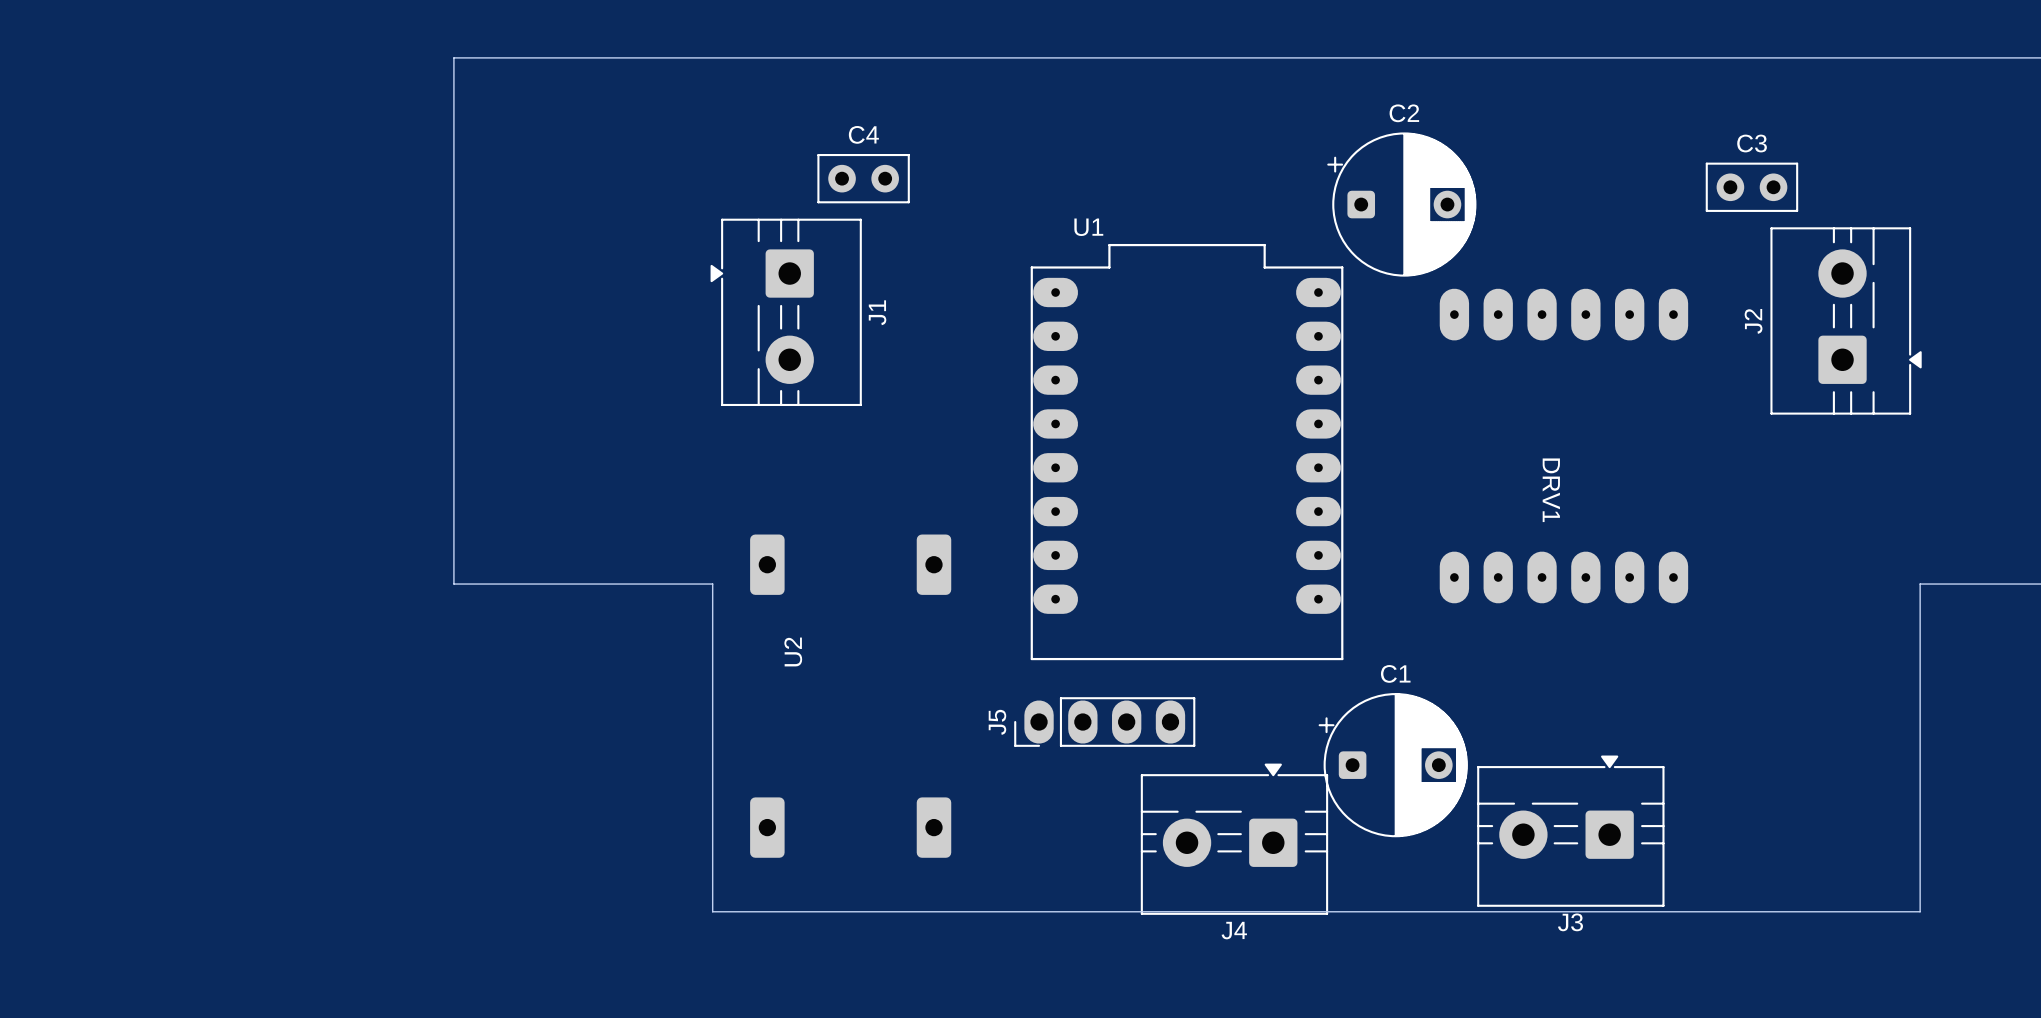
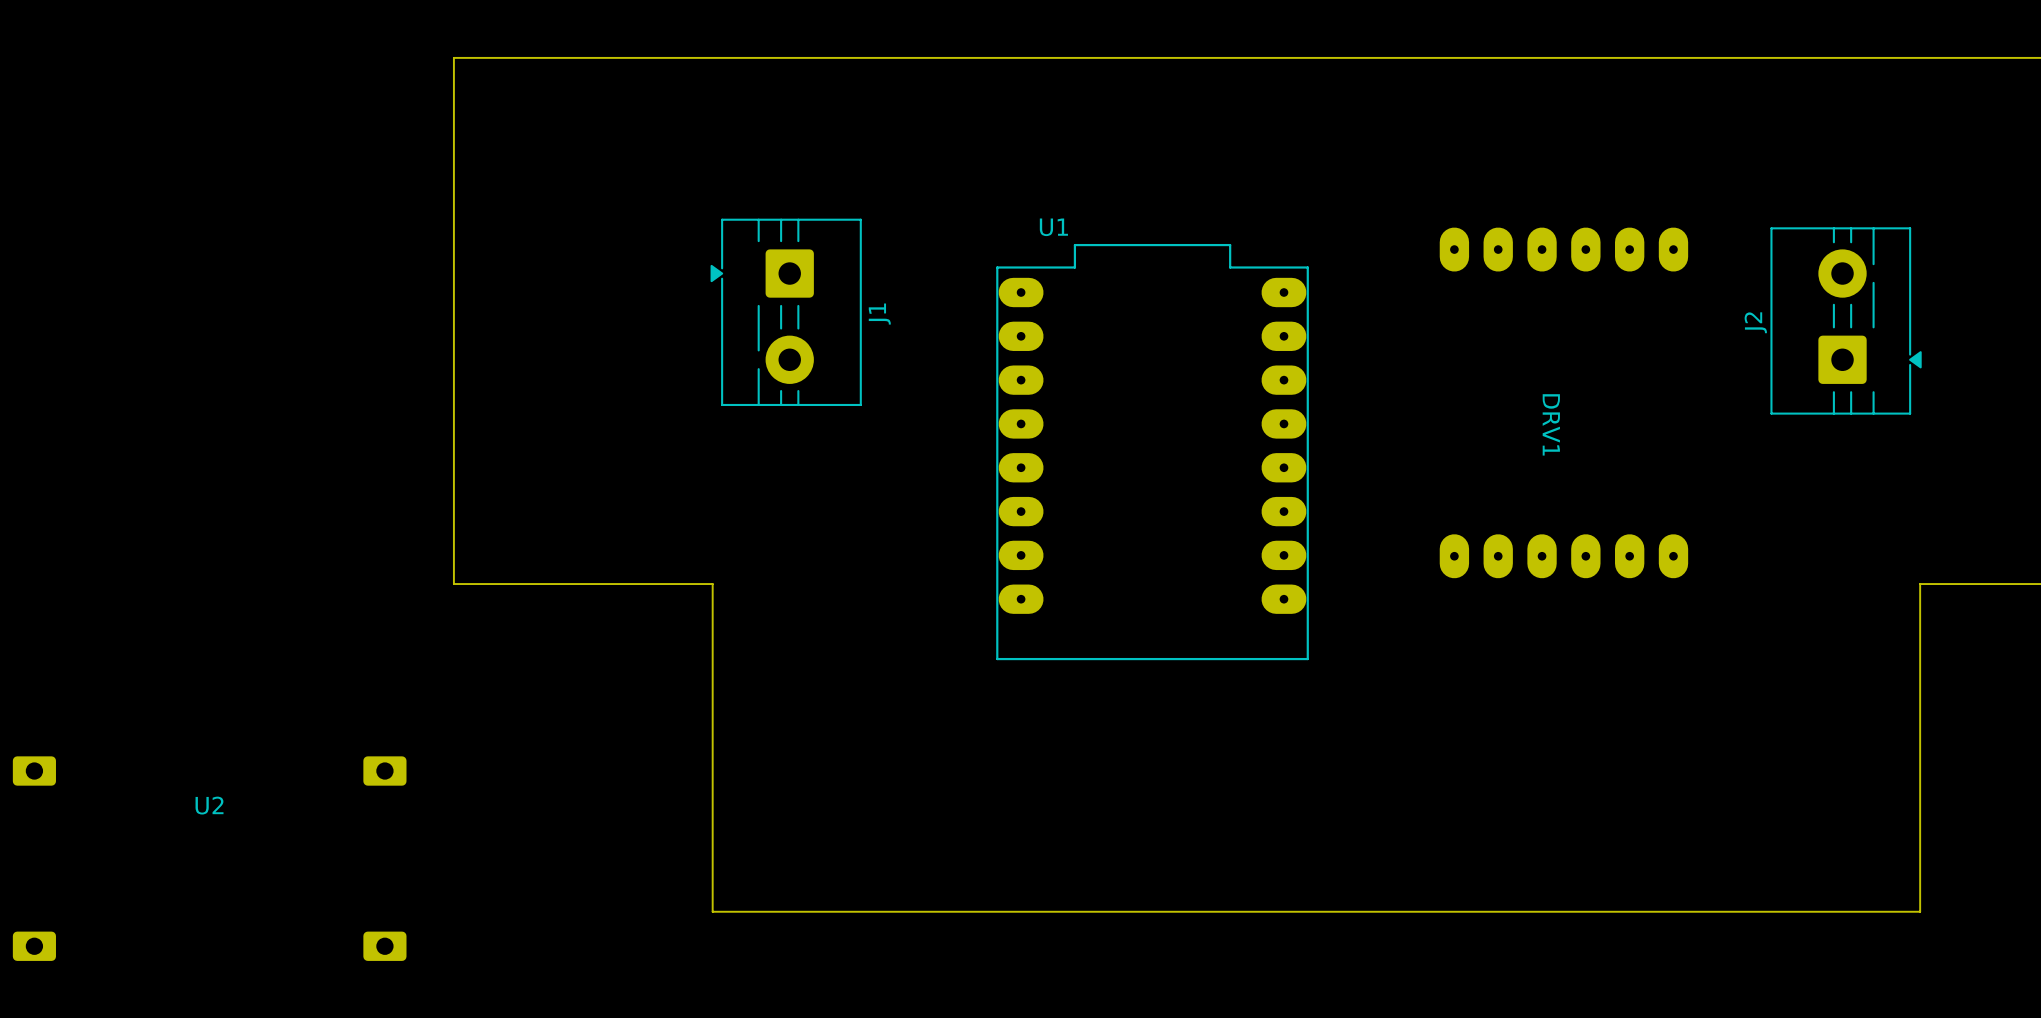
C4: (863, 178) -> none
C3: (1751, 187) -> none
C2: (1401, 204) -> none
DRV1 footprint: [1439, 288, 1689, 604] -> [1439, 227, 1689, 579]
U1 position: (1187, 452) -> (1152, 452)
U2 footprint: [750, 534, 952, 858] -> [12, 756, 407, 961]
U2 name position: U2 (793, 651) -> U2 (209, 805)
J5: (1104, 722) -> none
C1: (1393, 765) -> none
J3: (1570, 831) -> none
J4: (1234, 839) -> none

